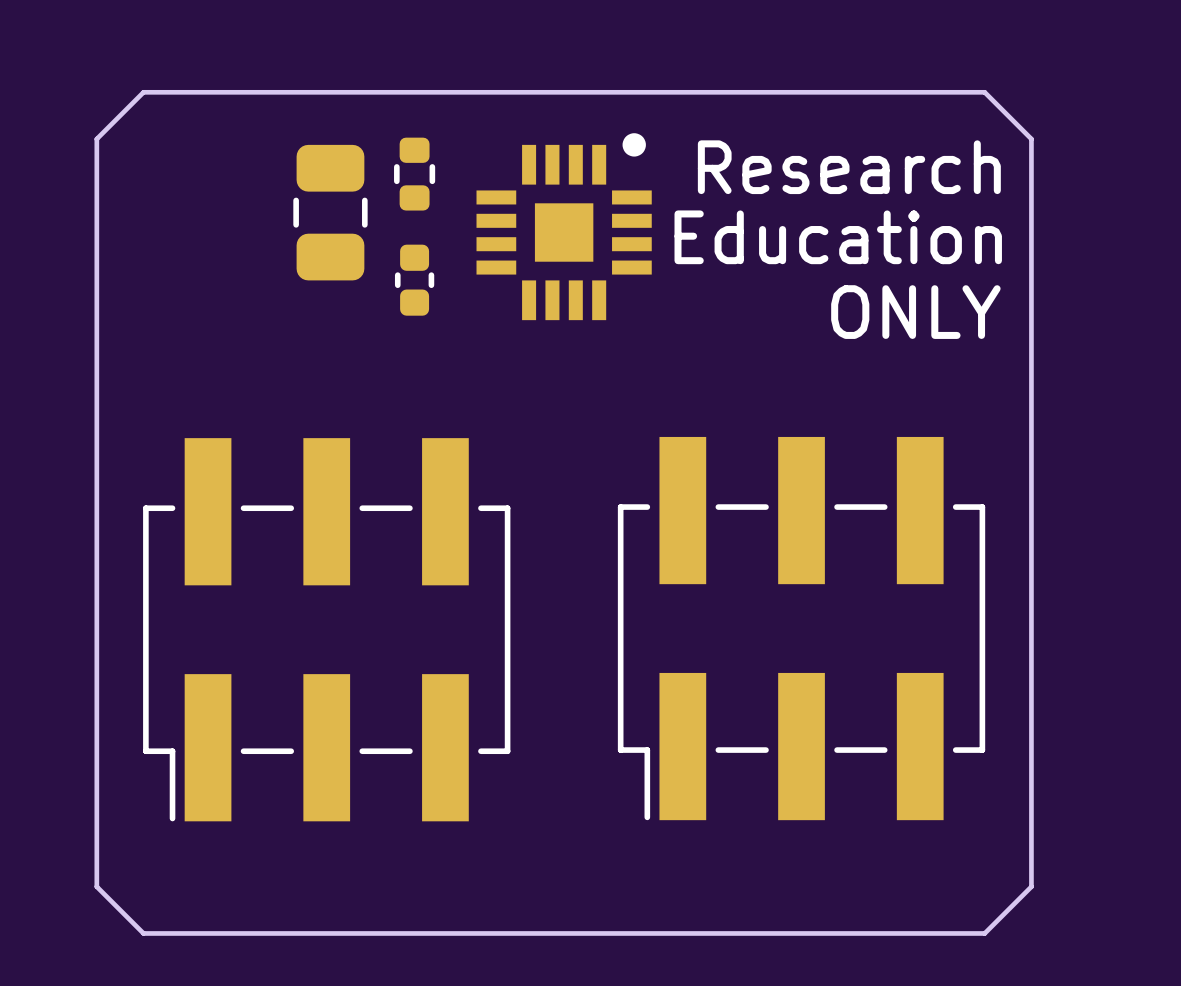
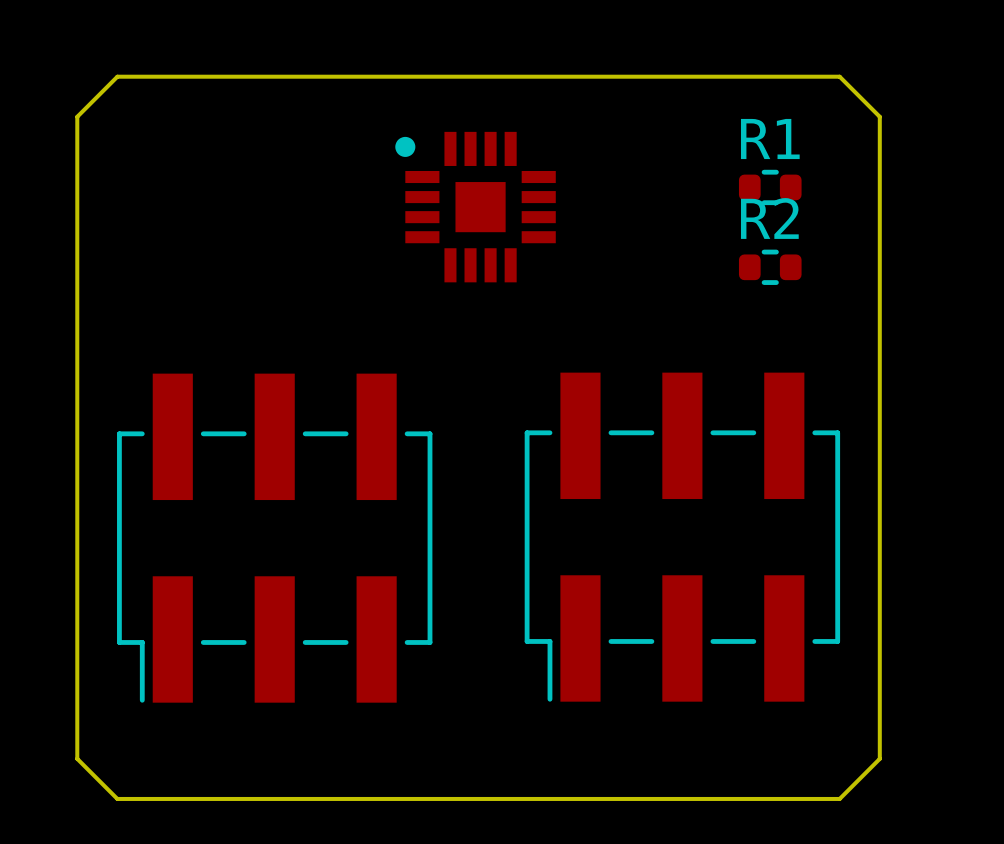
text: Research (849, 167) -> none
part: (414, 174) -> none
part: (330, 212) -> none
R1: none -> (770, 187)
part rotation: 0° (564, 226) -> 90° counterclockwise (475, 207)
text: Education (838, 237) -> none
part: (414, 280) -> none
text: ONLY (915, 312) -> none
R2: none -> (770, 267)

